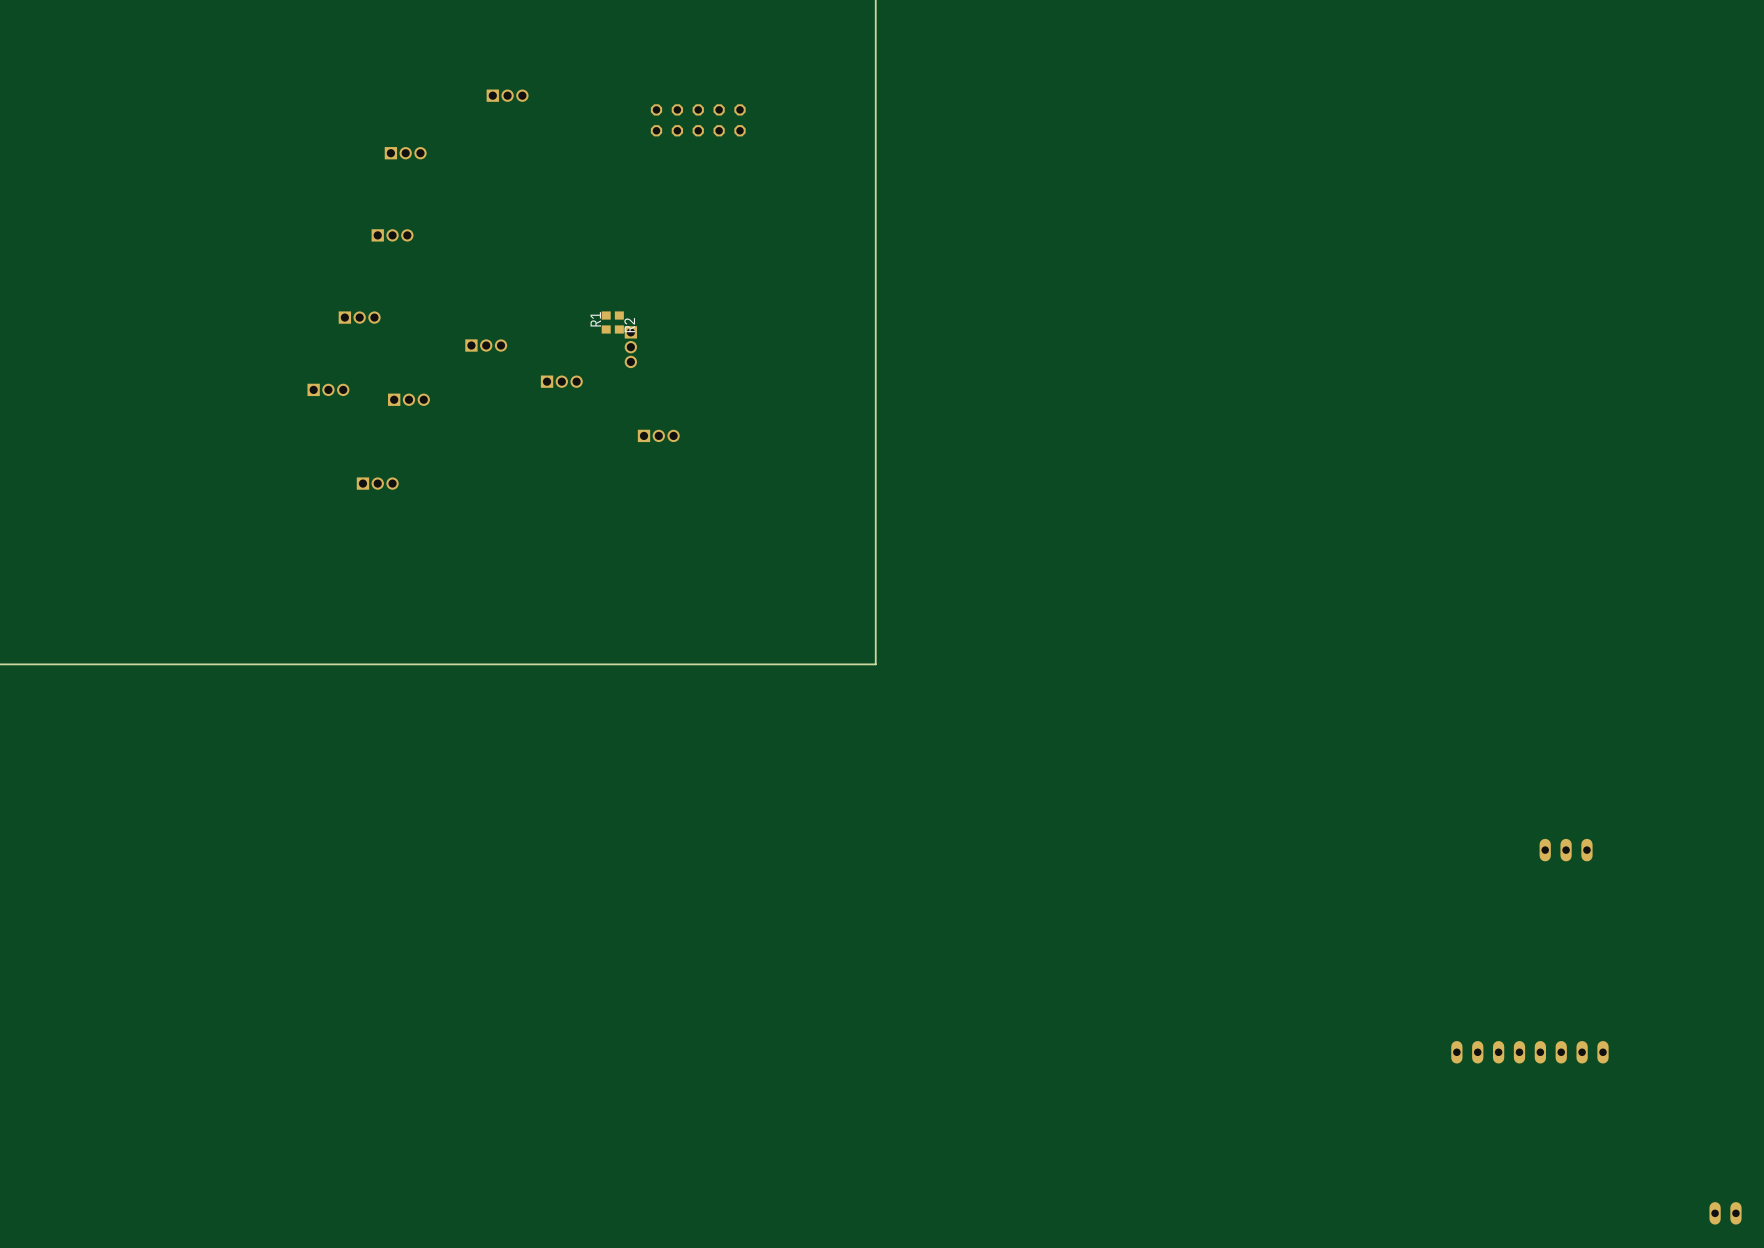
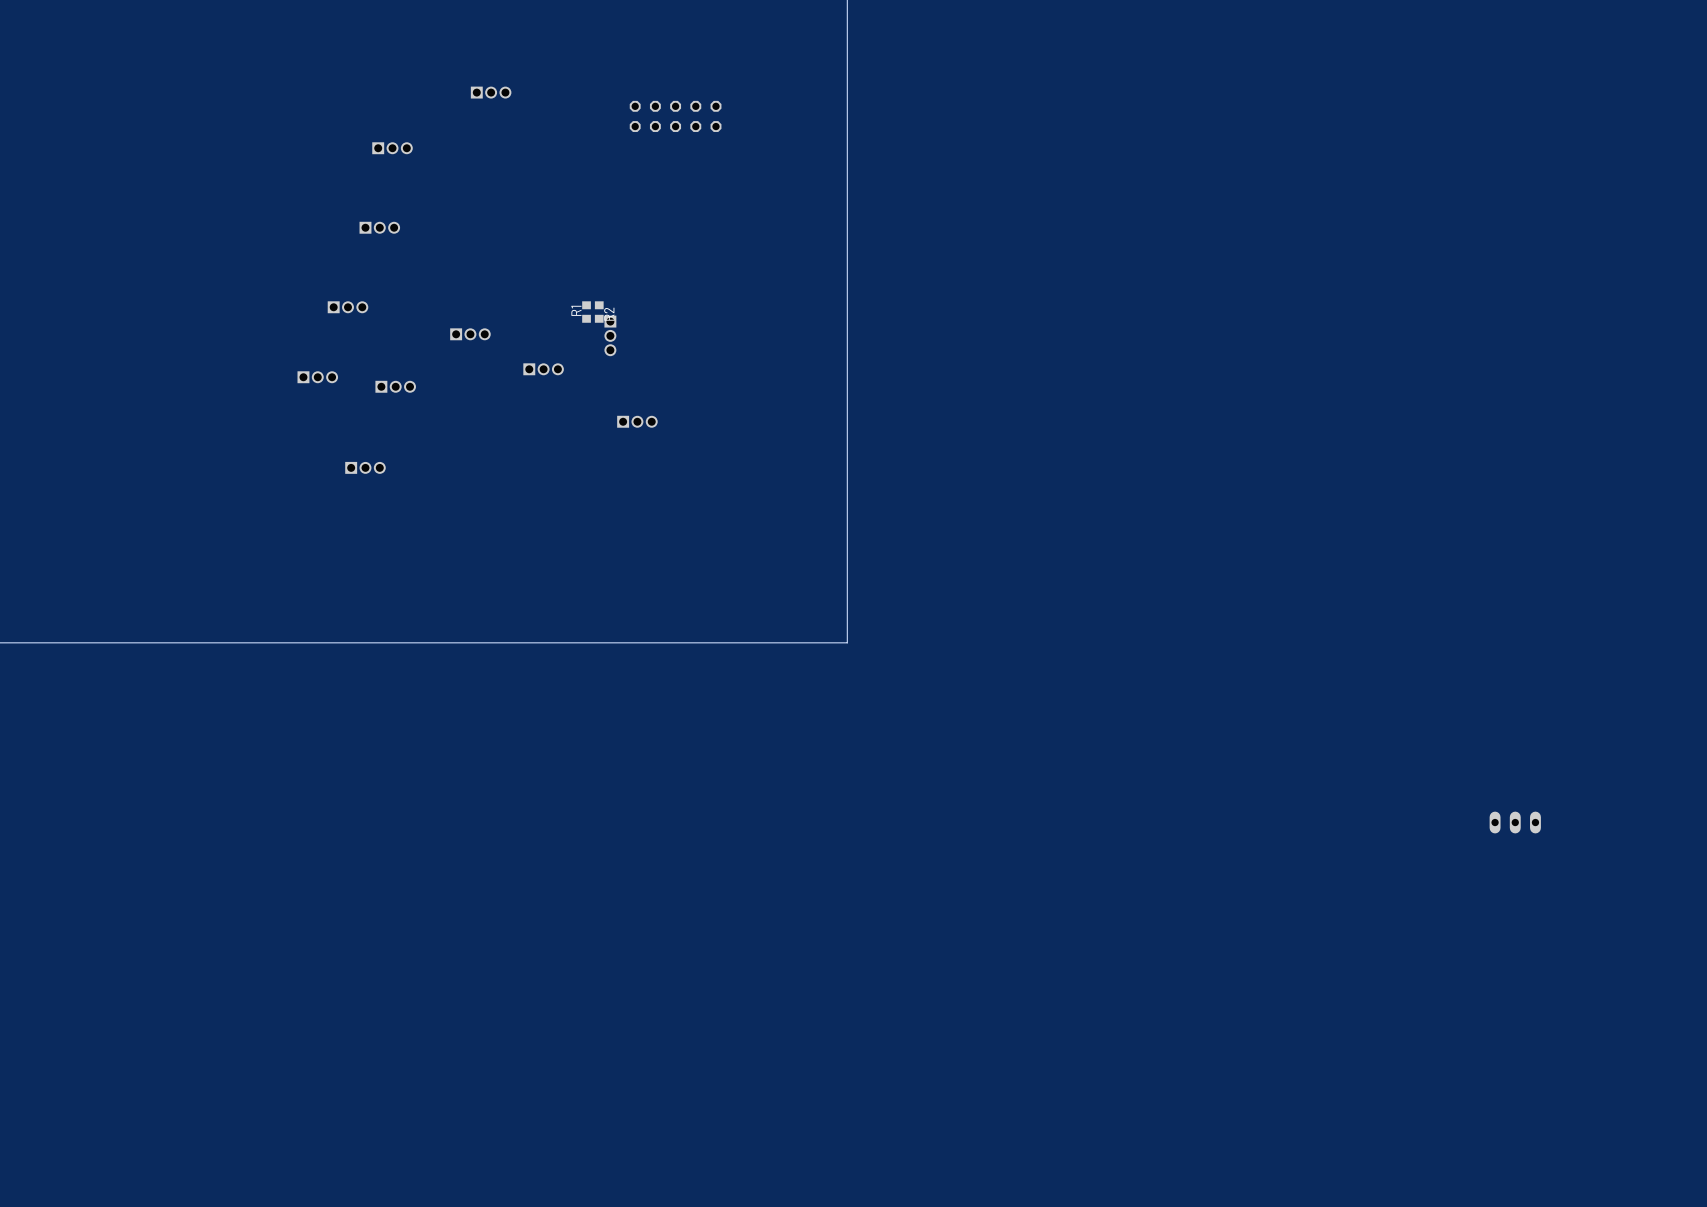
part: (1529, 1052) -> none
part: (1725, 1213) -> none

